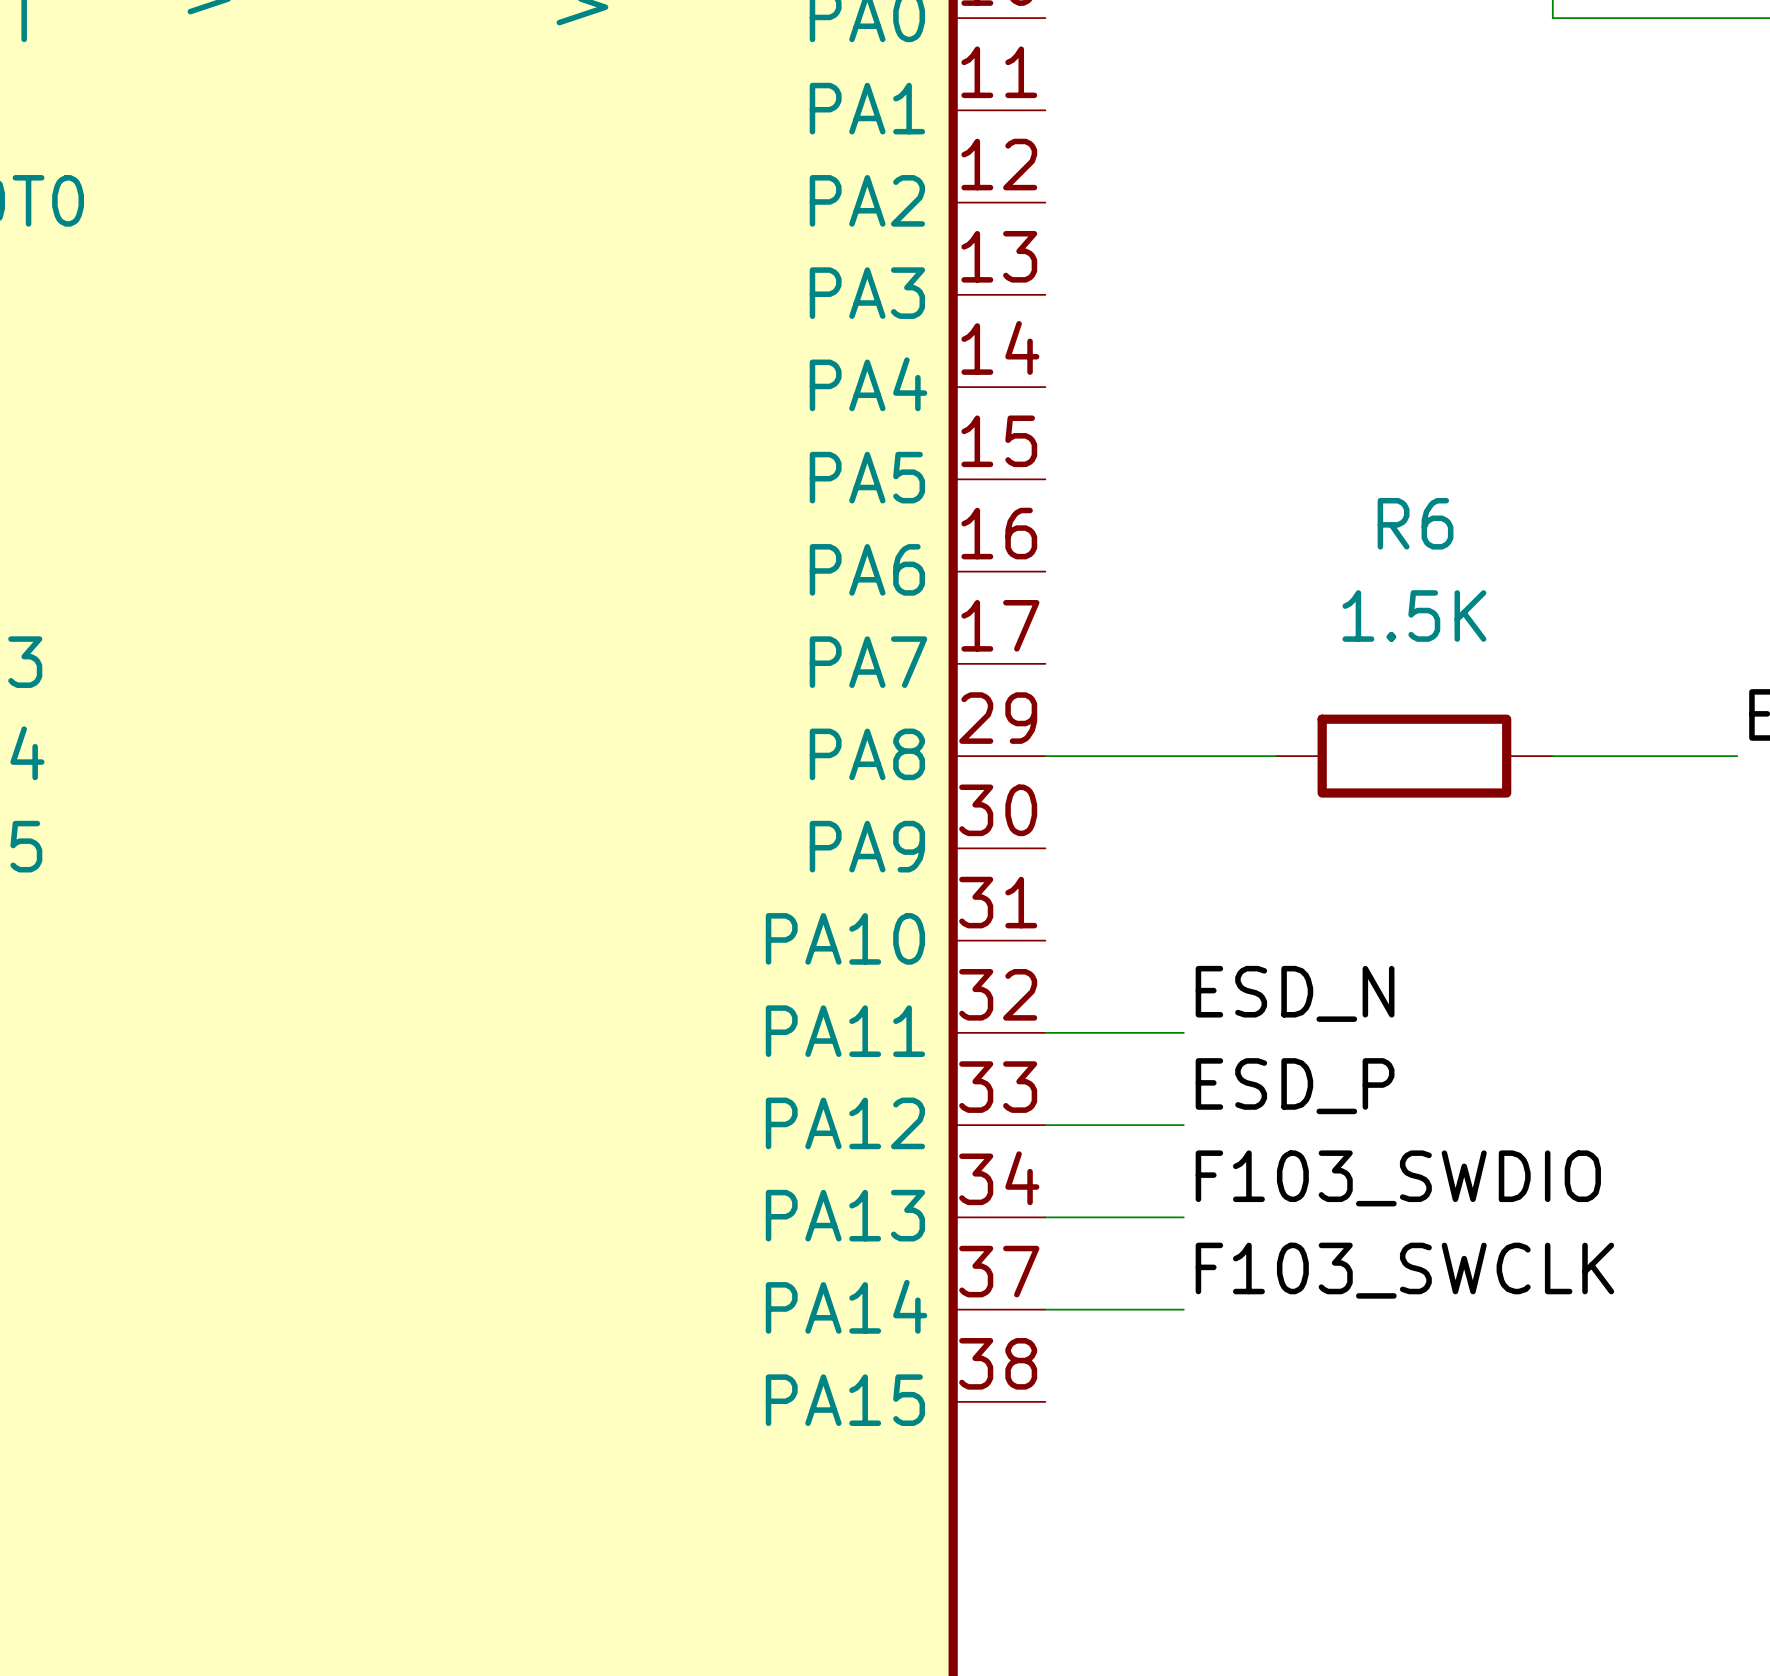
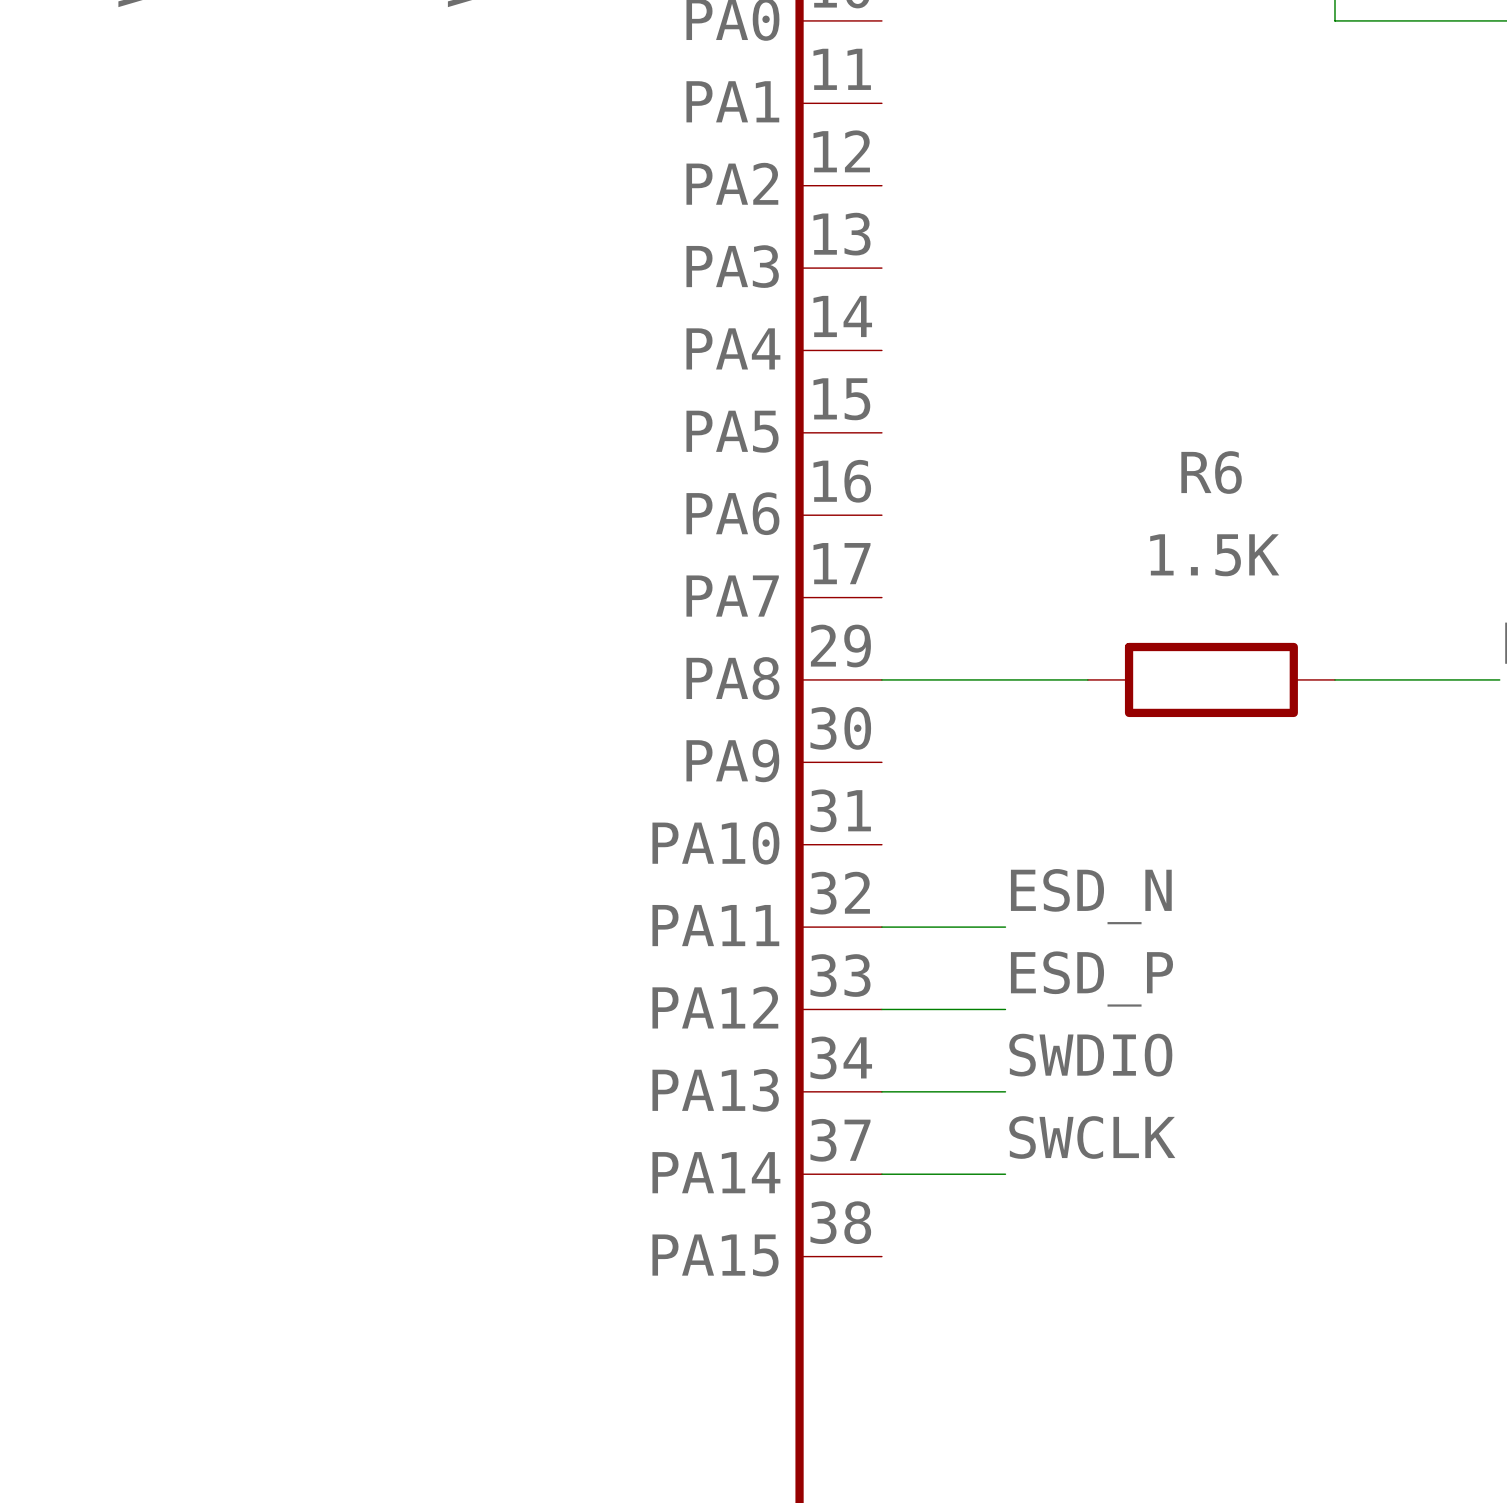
label: F103_SWDIO (1398, 1178) -> SWDIO (1090, 1055)
label: F103_SWCLK (1404, 1270) -> SWCLK (1092, 1137)

